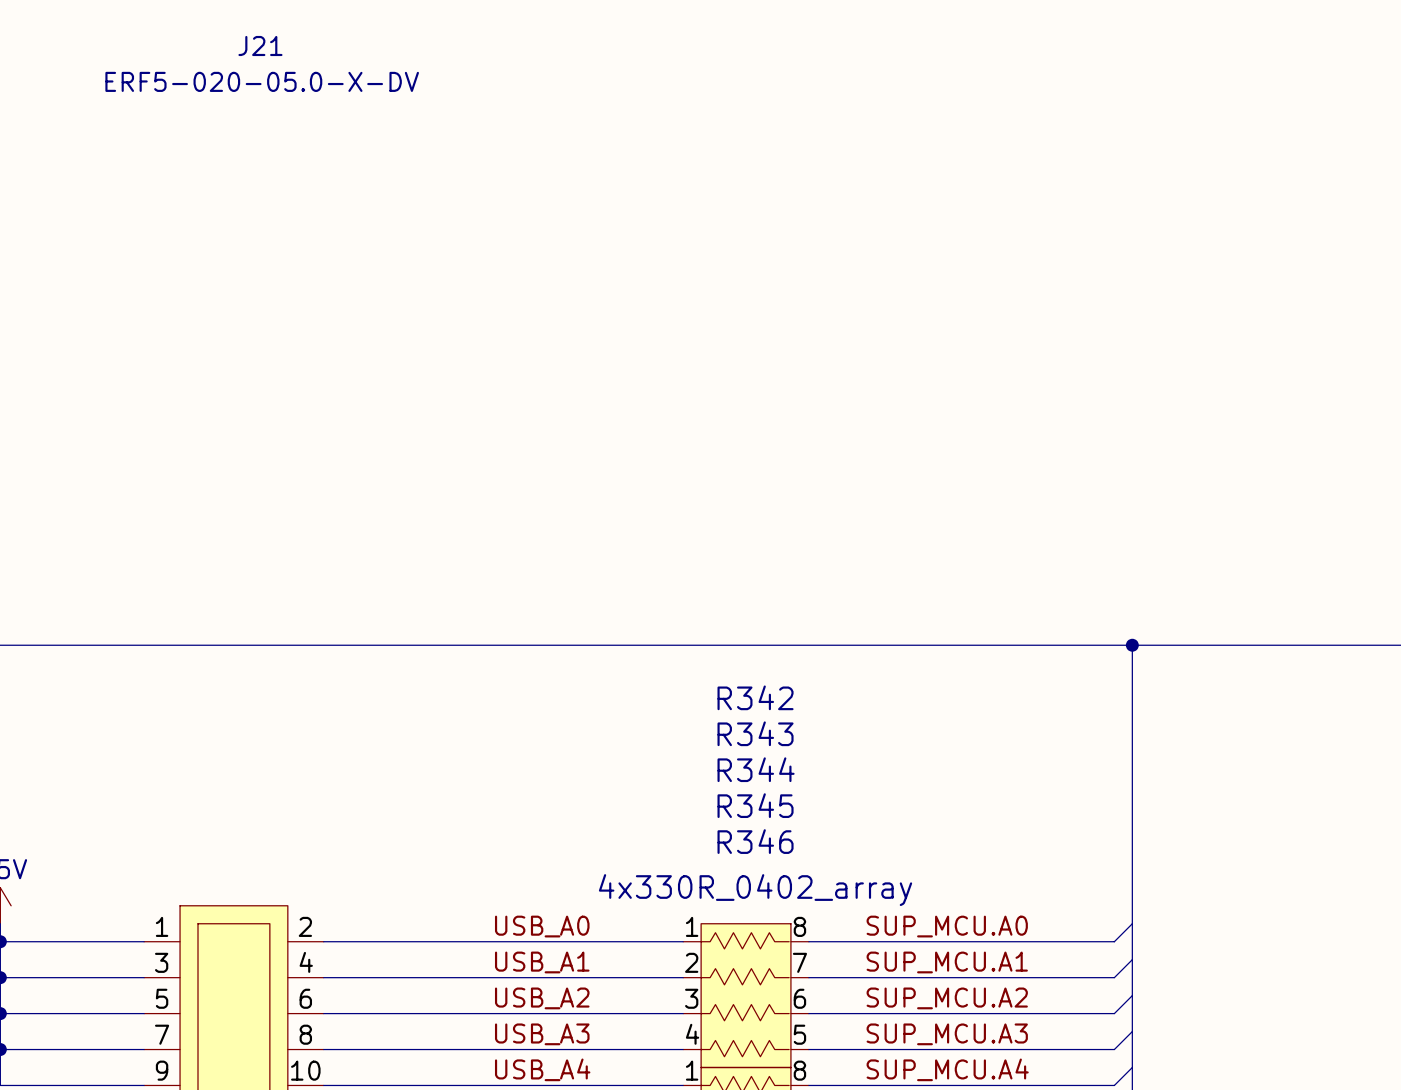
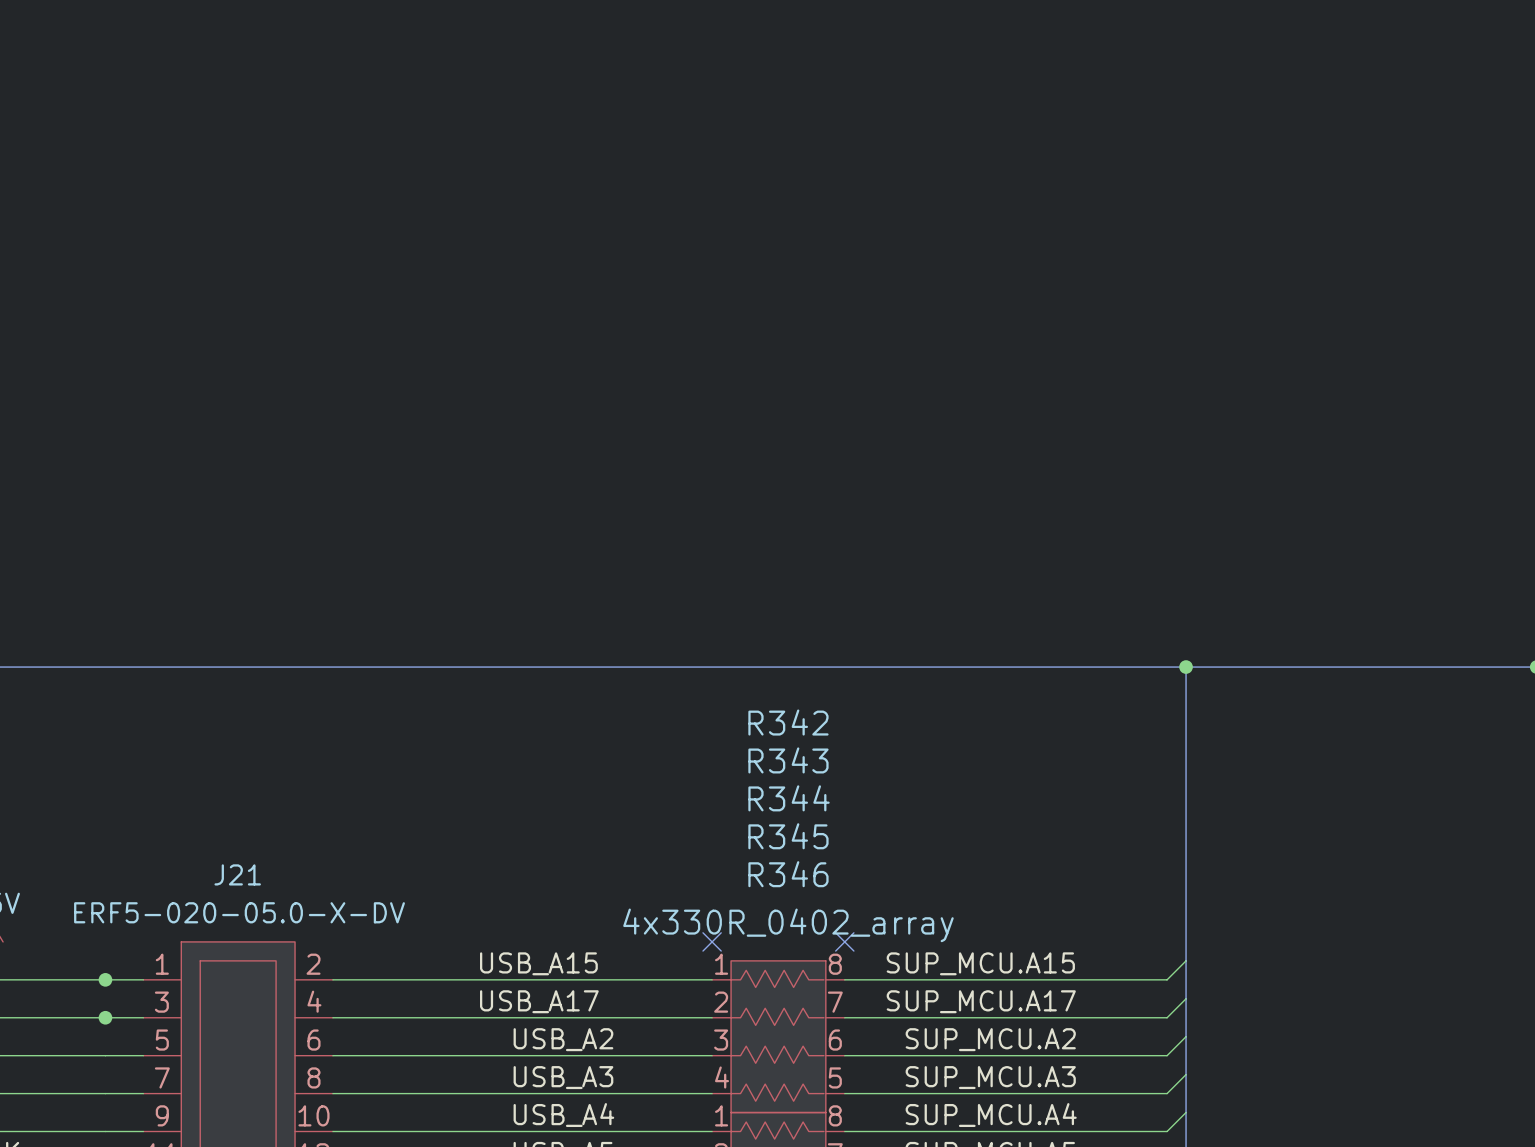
J21 name position: J21 (260, 46) -> J21 (237, 874)
J21 value position: ERF5-020-05.0-X-DV (262, 81) -> ERF5-020-05.0-X-DV (239, 912)
no-connect mark: none -> (712, 941)
no-connect mark: none -> (844, 941)
label: none -> USB_A15 (538, 963)
label: USB_A0 (542, 926) -> none
label: SUP_MCU.A0 (947, 926) -> SUP_MCU.A15 (980, 963)
junction: none -> (105, 979)
label: none -> USB_A17 (539, 1001)
label: USB_A1 (542, 962) -> none
label: SUP_MCU.A1 (947, 962) -> SUP_MCU.A17 (981, 1001)
junction: none -> (105, 1017)

